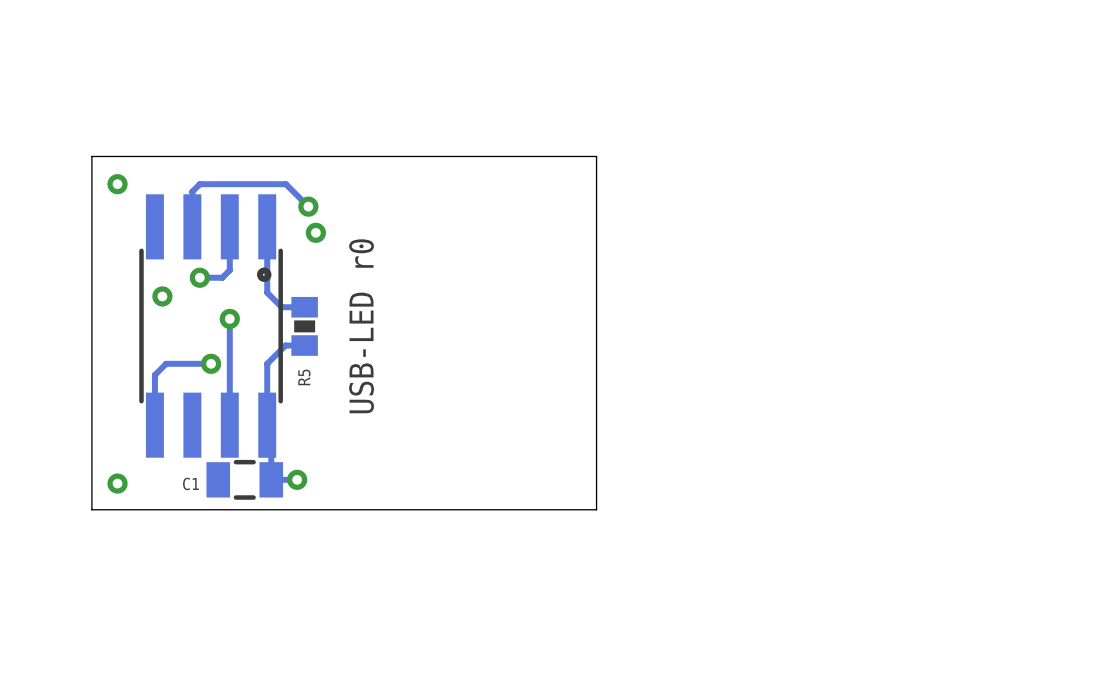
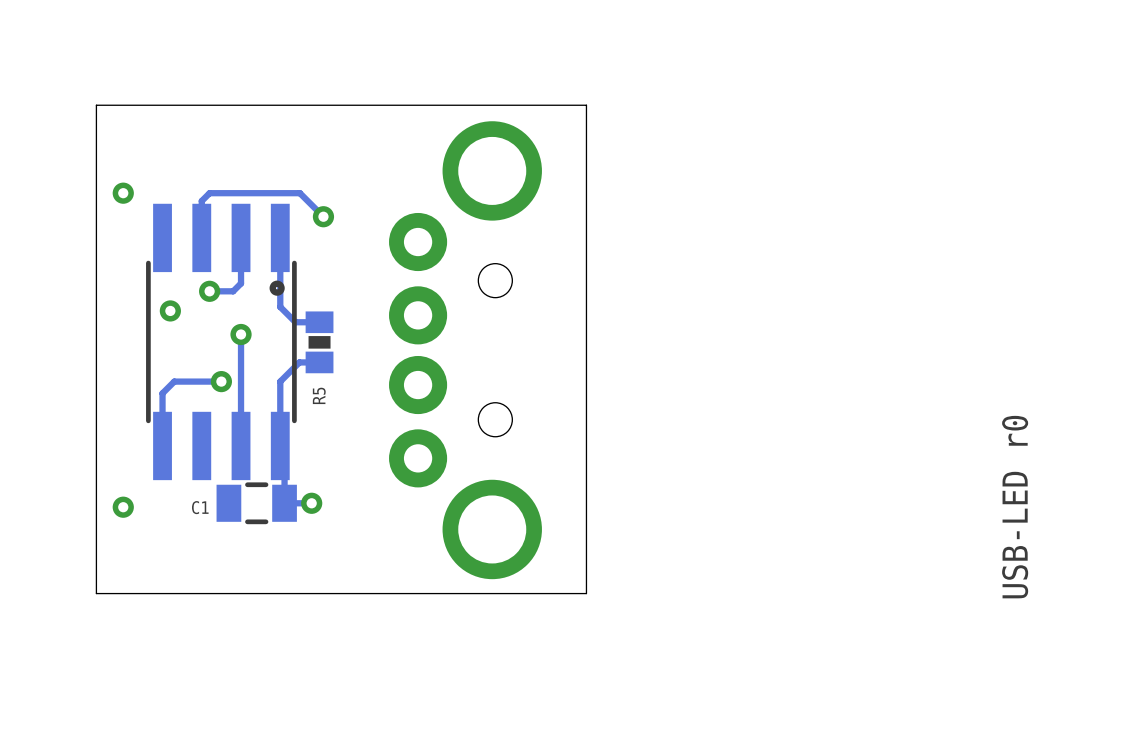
board edge: (91, 156) (596, 156) (596, 509) (91, 509) -> (96, 164) (96, 105) (586, 105) (586, 593) (96, 593) (96, 534)
via: (315, 232) -> none
text position: USB-LED r0 (361, 326) -> USB-LED r0 (1015, 507)
part: none -> (465, 350)

